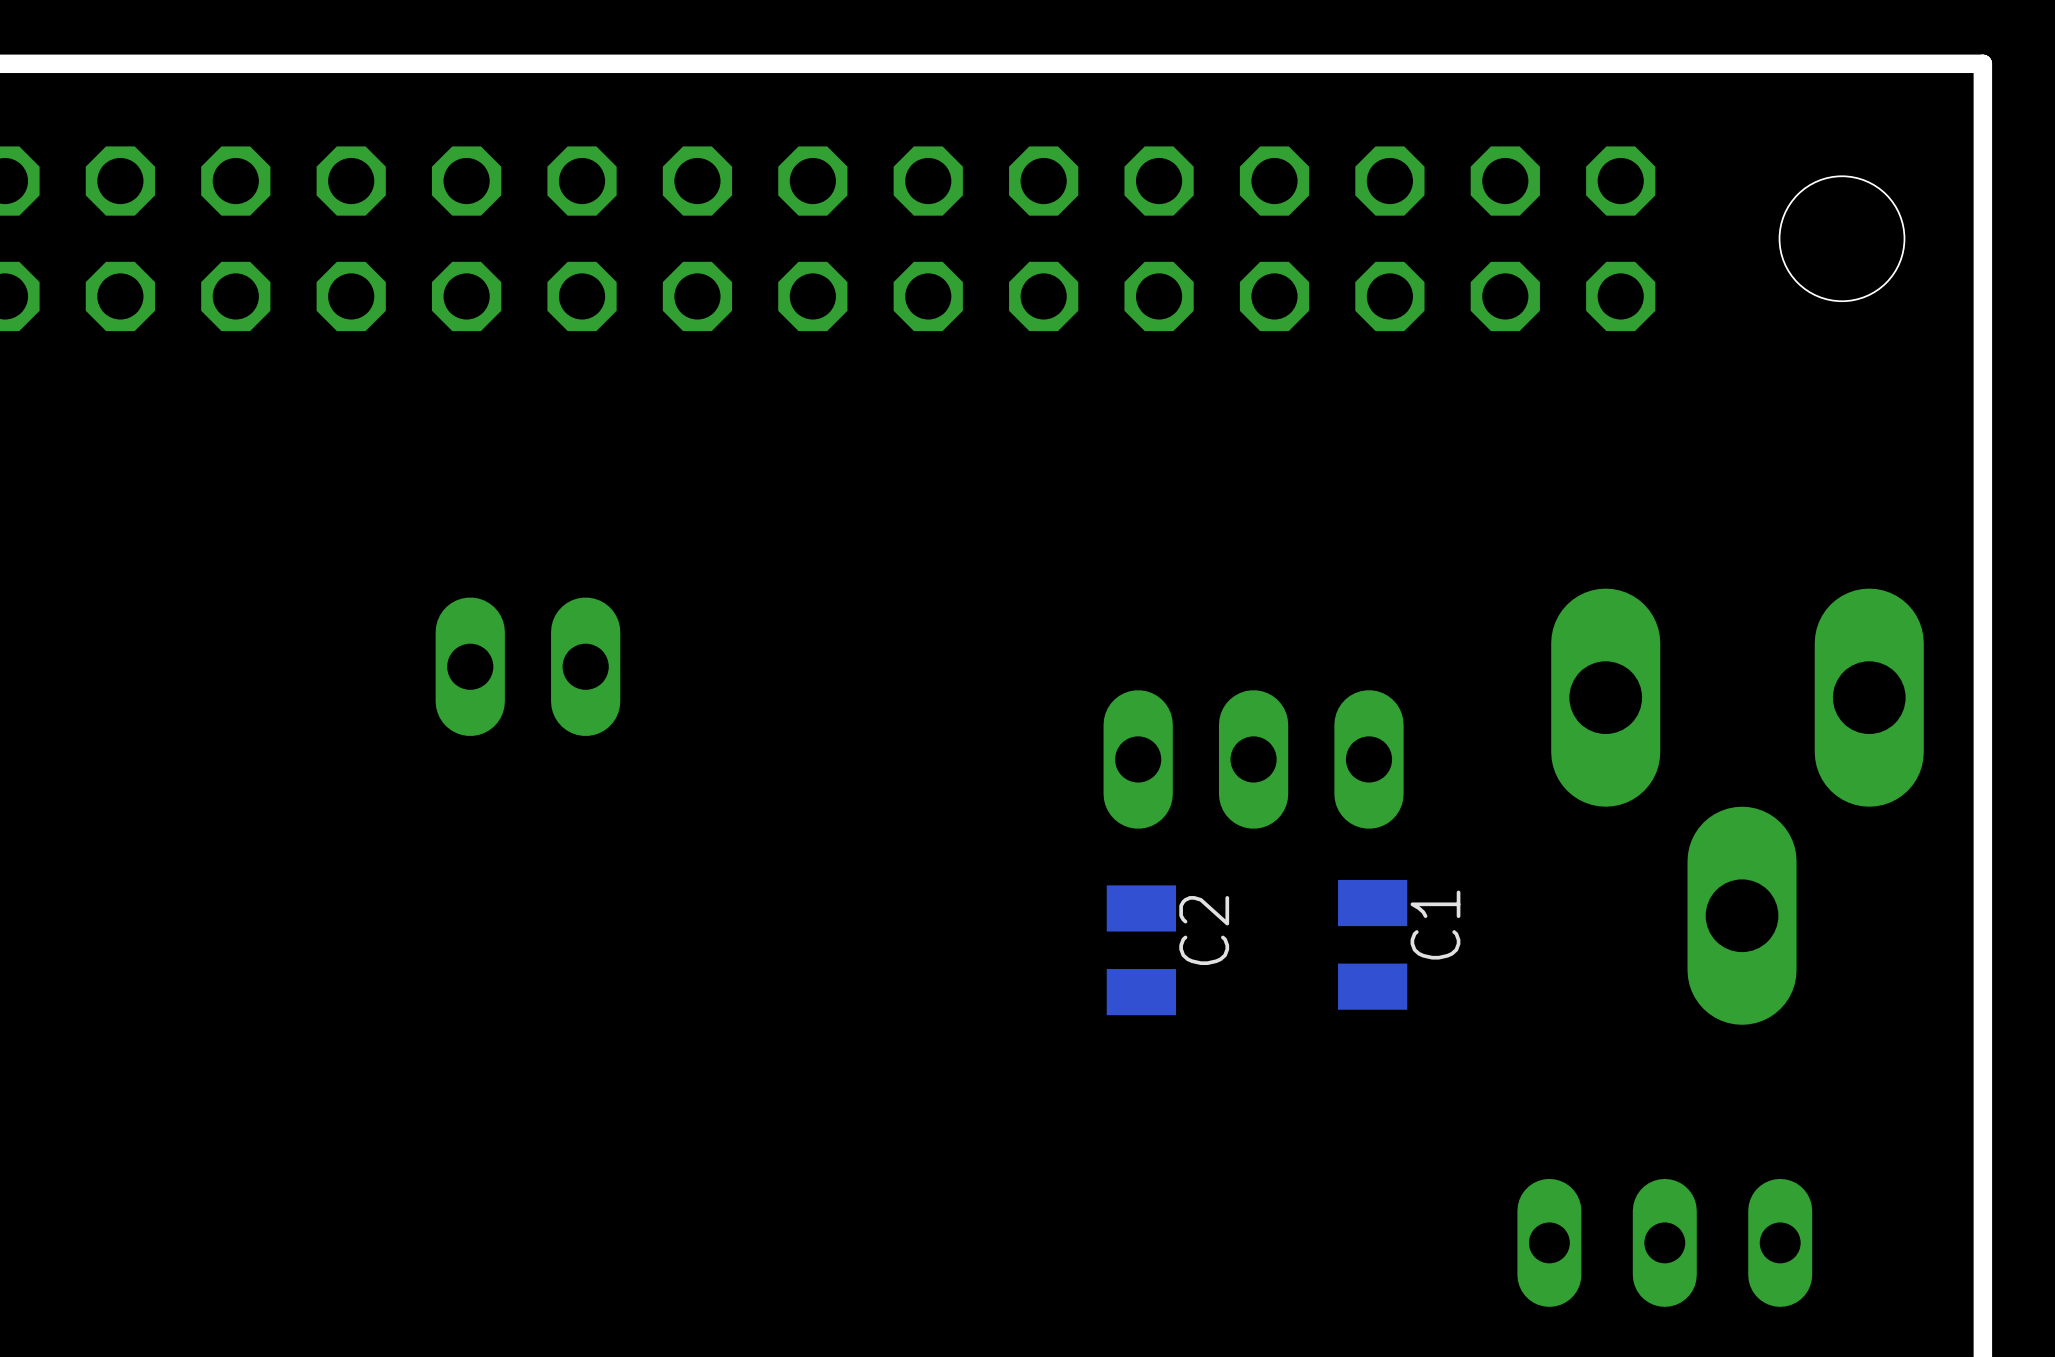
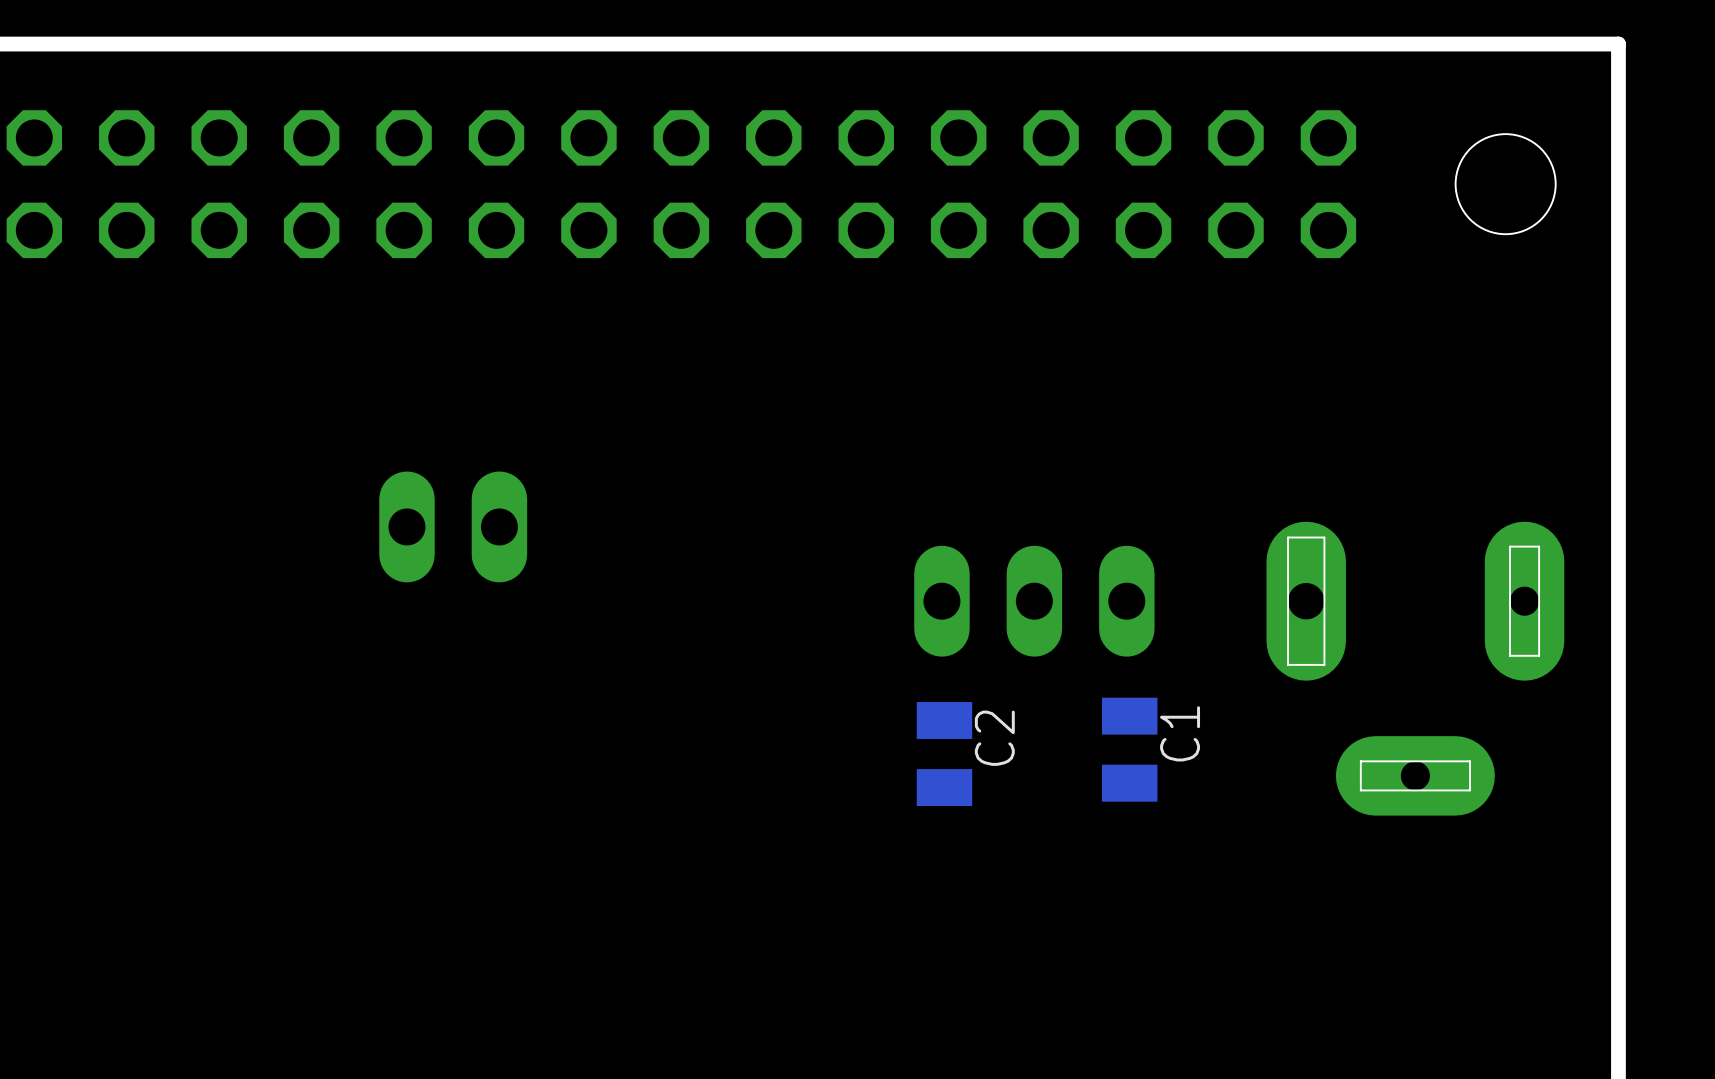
part footprint: [1551, 588, 1924, 1025] -> [1266, 521, 1565, 816]
part: (1664, 1242) -> none

